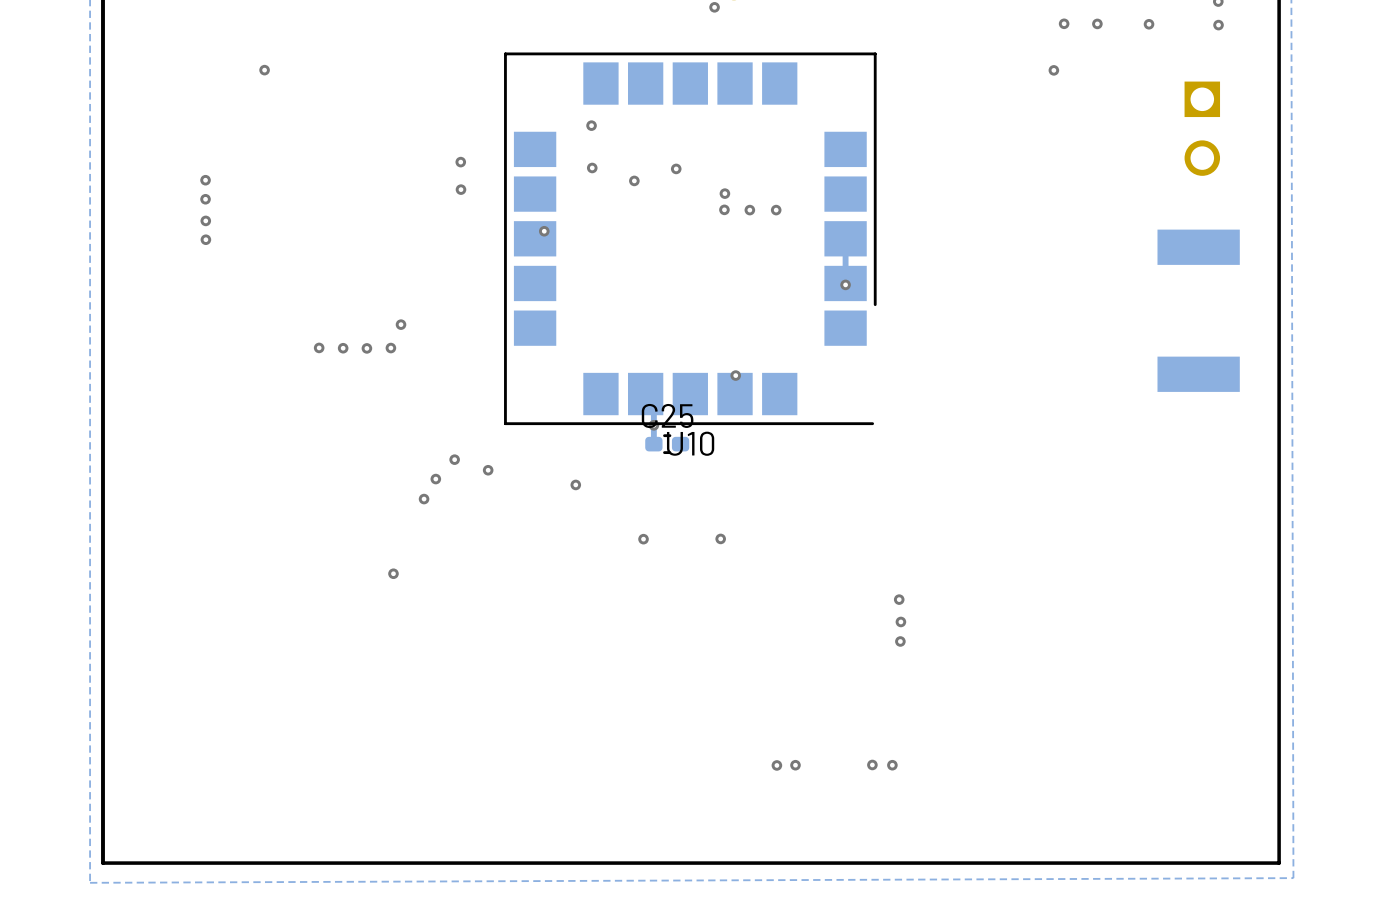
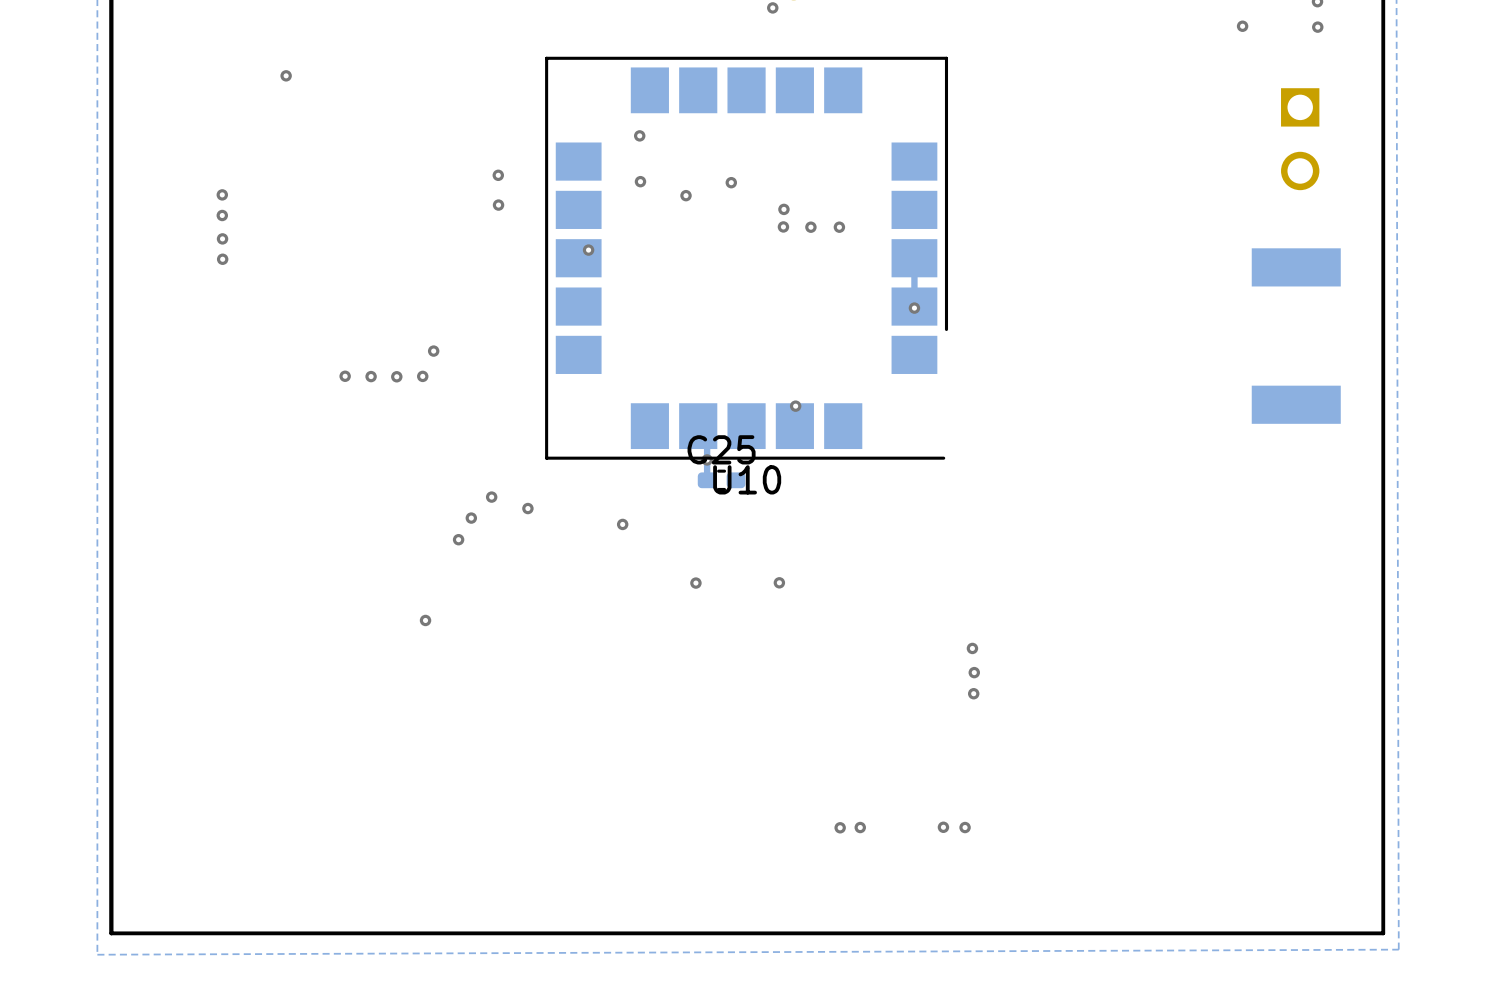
via: (1064, 23) -> none
via: (1097, 23) -> none
via: (1053, 70) -> none

